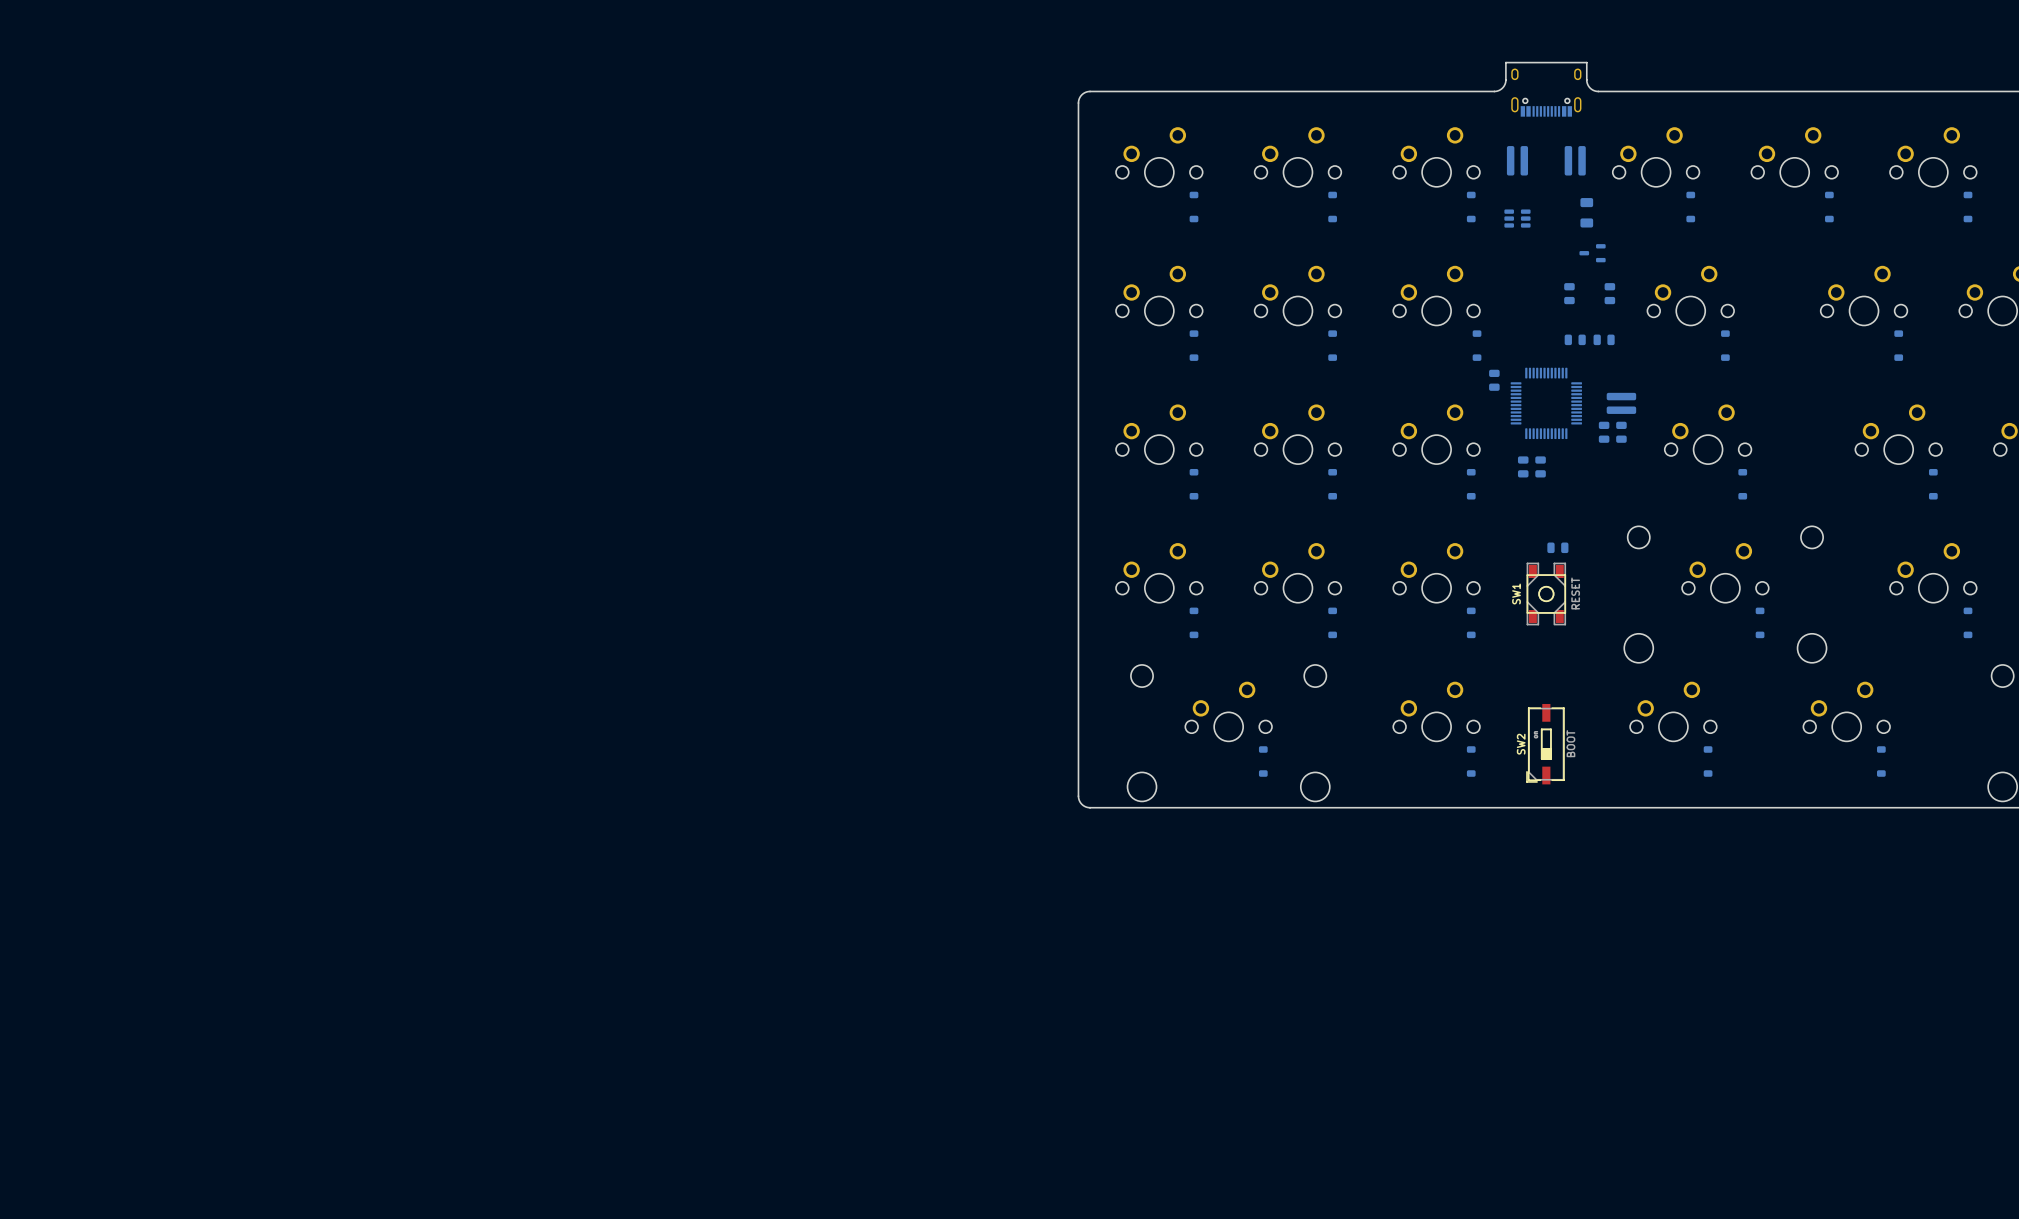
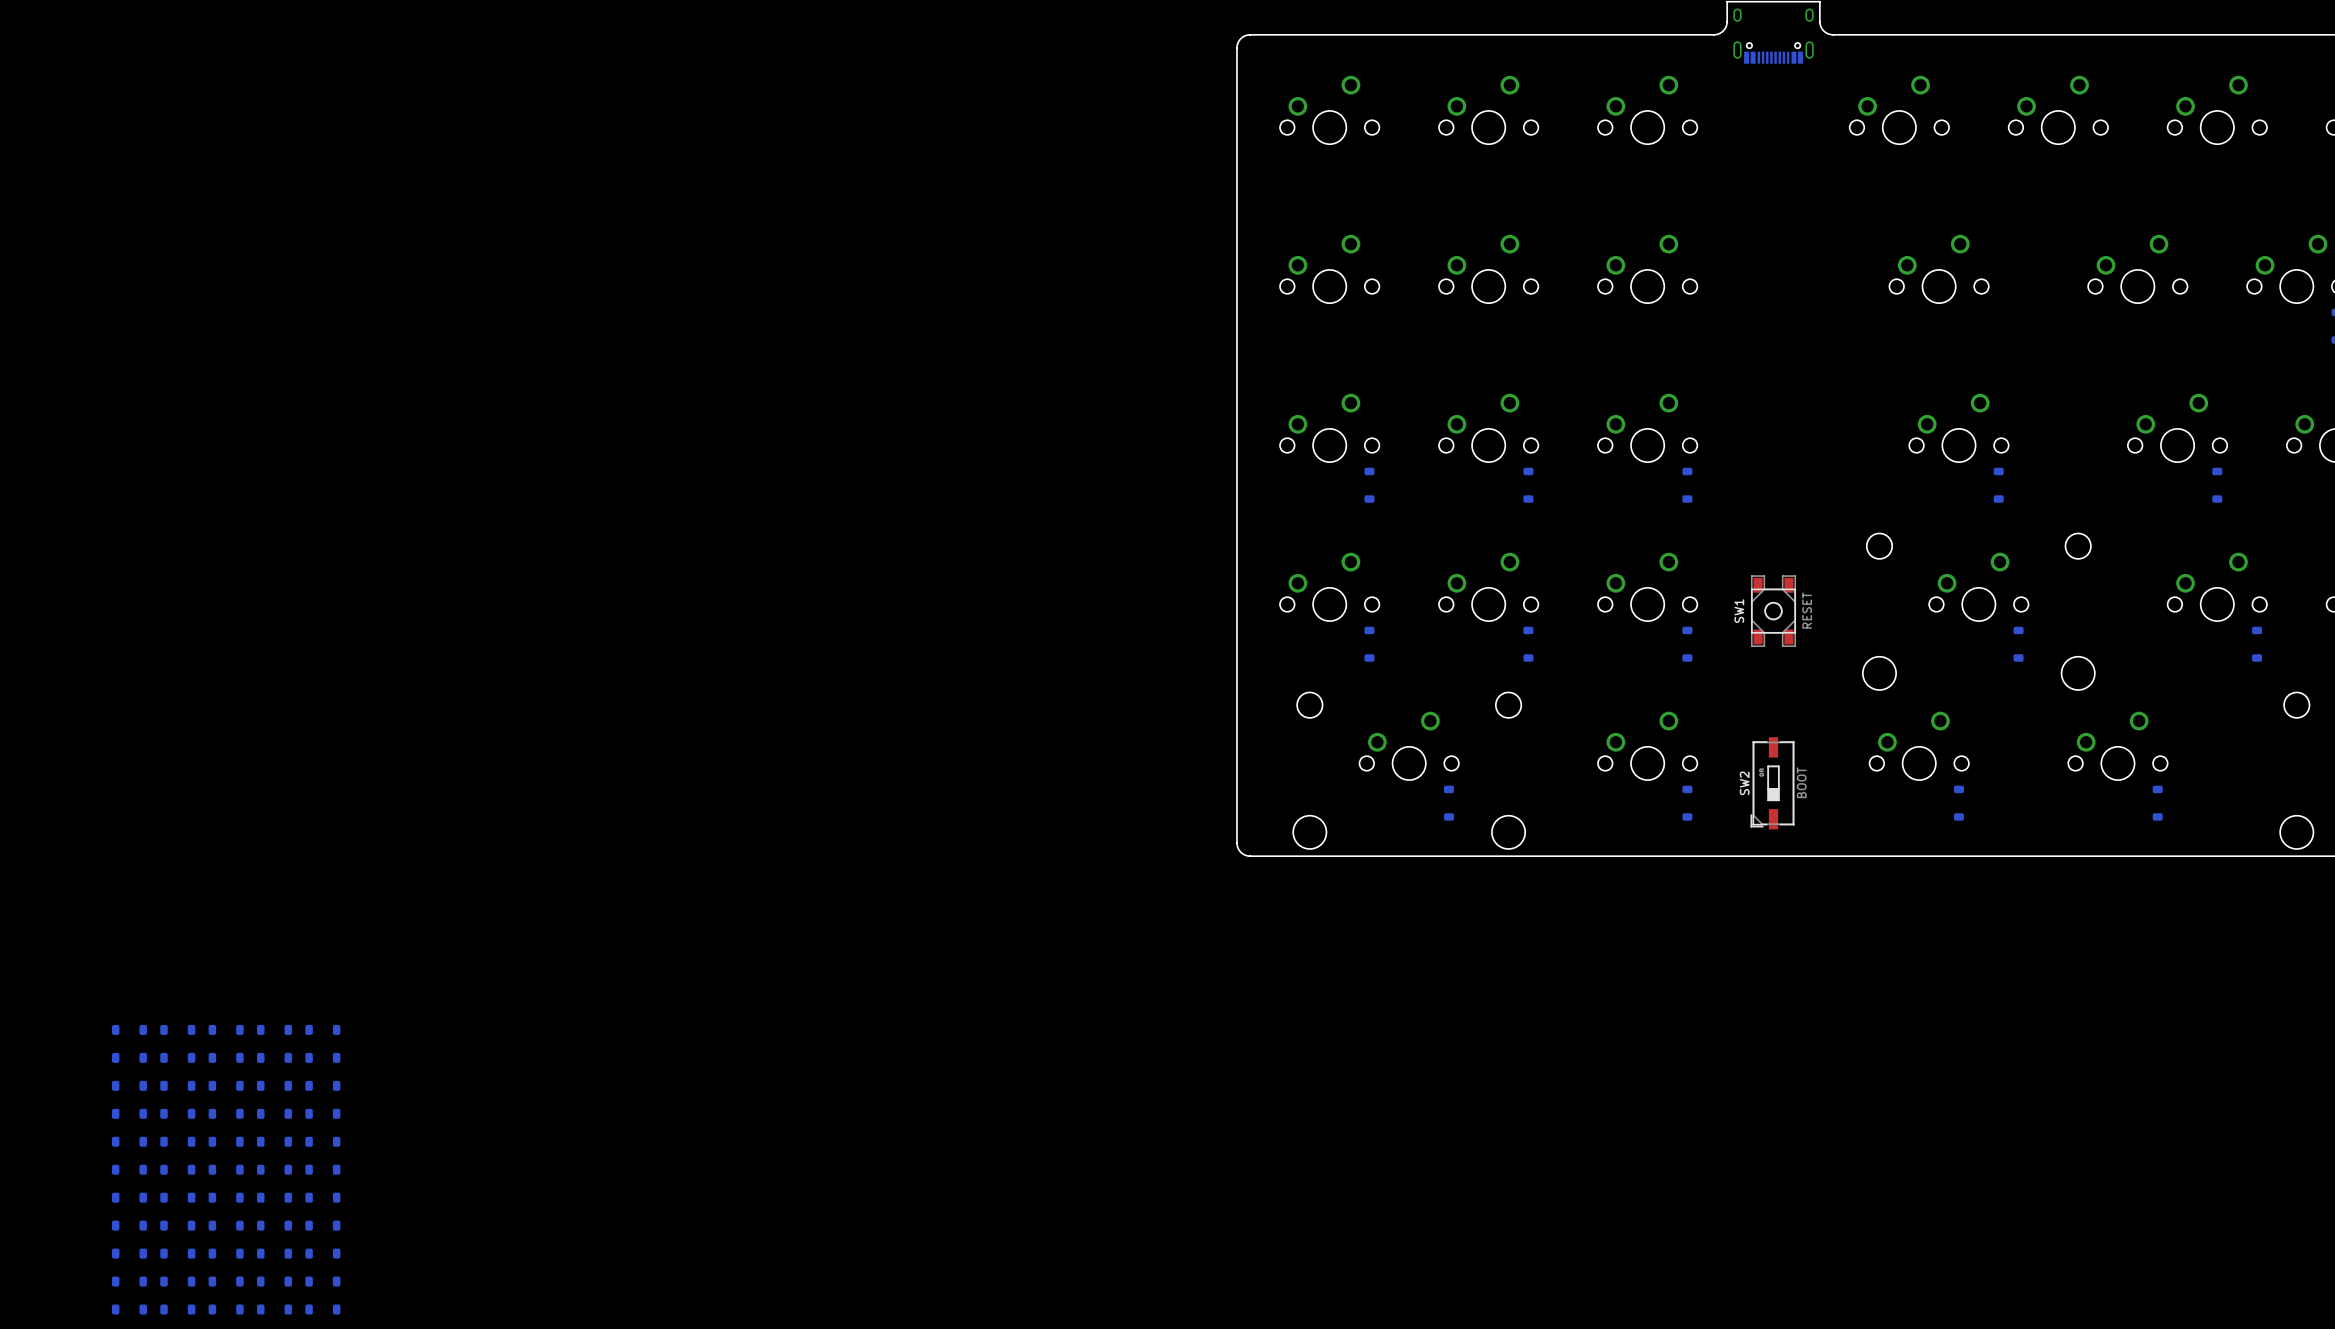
part: (1517, 160) -> none
part: (1575, 160) -> none
part: (1194, 207) -> none
part: (1332, 207) -> none
part: (1471, 207) -> none
part: (1690, 207) -> none
part: (1829, 207) -> none
part: (1968, 207) -> none
part: (1586, 212) -> none
part: (1517, 218) -> none
part: (1592, 253) -> none
part: (1569, 293) -> none
part: (1609, 293) -> none
part: (1575, 339) -> none
part: (1604, 339) -> none
part: (1194, 345) -> none
part: (1332, 345) -> none
part: (1477, 345) -> none
part: (1725, 345) -> none
part: (1898, 345) -> none
part: (1494, 380) -> none
part: (1546, 403) -> none
part: (1621, 403) -> none
part: (1604, 432) -> none
part: (1621, 432) -> none
part: (1523, 466) -> none
part: (1540, 466) -> none
part: (1557, 547) -> none
part: none -> (129, 1029)
part: none -> (177, 1029)
part: none -> (226, 1029)
part: none -> (274, 1029)
part: none -> (322, 1029)
part: none -> (129, 1057)
part: none -> (177, 1057)
part: none -> (226, 1057)
part: none -> (274, 1057)
part: none -> (322, 1057)
part: none -> (129, 1085)
part: none -> (177, 1085)
part: none -> (226, 1085)
part: none -> (274, 1085)
part: none -> (322, 1085)
part: none -> (129, 1113)
part: none -> (177, 1113)
part: none -> (226, 1113)
part: none -> (274, 1113)
part: none -> (322, 1113)
part: none -> (129, 1141)
part: none -> (177, 1141)
part: none -> (226, 1141)
part: none -> (274, 1141)
part: none -> (322, 1141)
part: none -> (129, 1169)
part: none -> (177, 1169)
part: none -> (226, 1169)
part: none -> (274, 1169)
part: none -> (322, 1169)
part: none -> (129, 1197)
part: none -> (177, 1197)
part: none -> (226, 1197)
part: none -> (274, 1197)
part: none -> (322, 1197)
part: none -> (129, 1225)
part: none -> (177, 1225)
part: none -> (226, 1225)
part: none -> (274, 1225)
part: none -> (322, 1225)
part: none -> (129, 1253)
part: none -> (177, 1253)
part: none -> (226, 1253)
part: none -> (274, 1253)
part: none -> (322, 1253)
part: none -> (129, 1281)
part: none -> (177, 1281)
part: none -> (226, 1281)
part: none -> (274, 1281)
part: none -> (322, 1281)
part: none -> (129, 1309)
part: none -> (177, 1309)
part: none -> (226, 1309)
part: none -> (274, 1309)
part: none -> (322, 1309)

